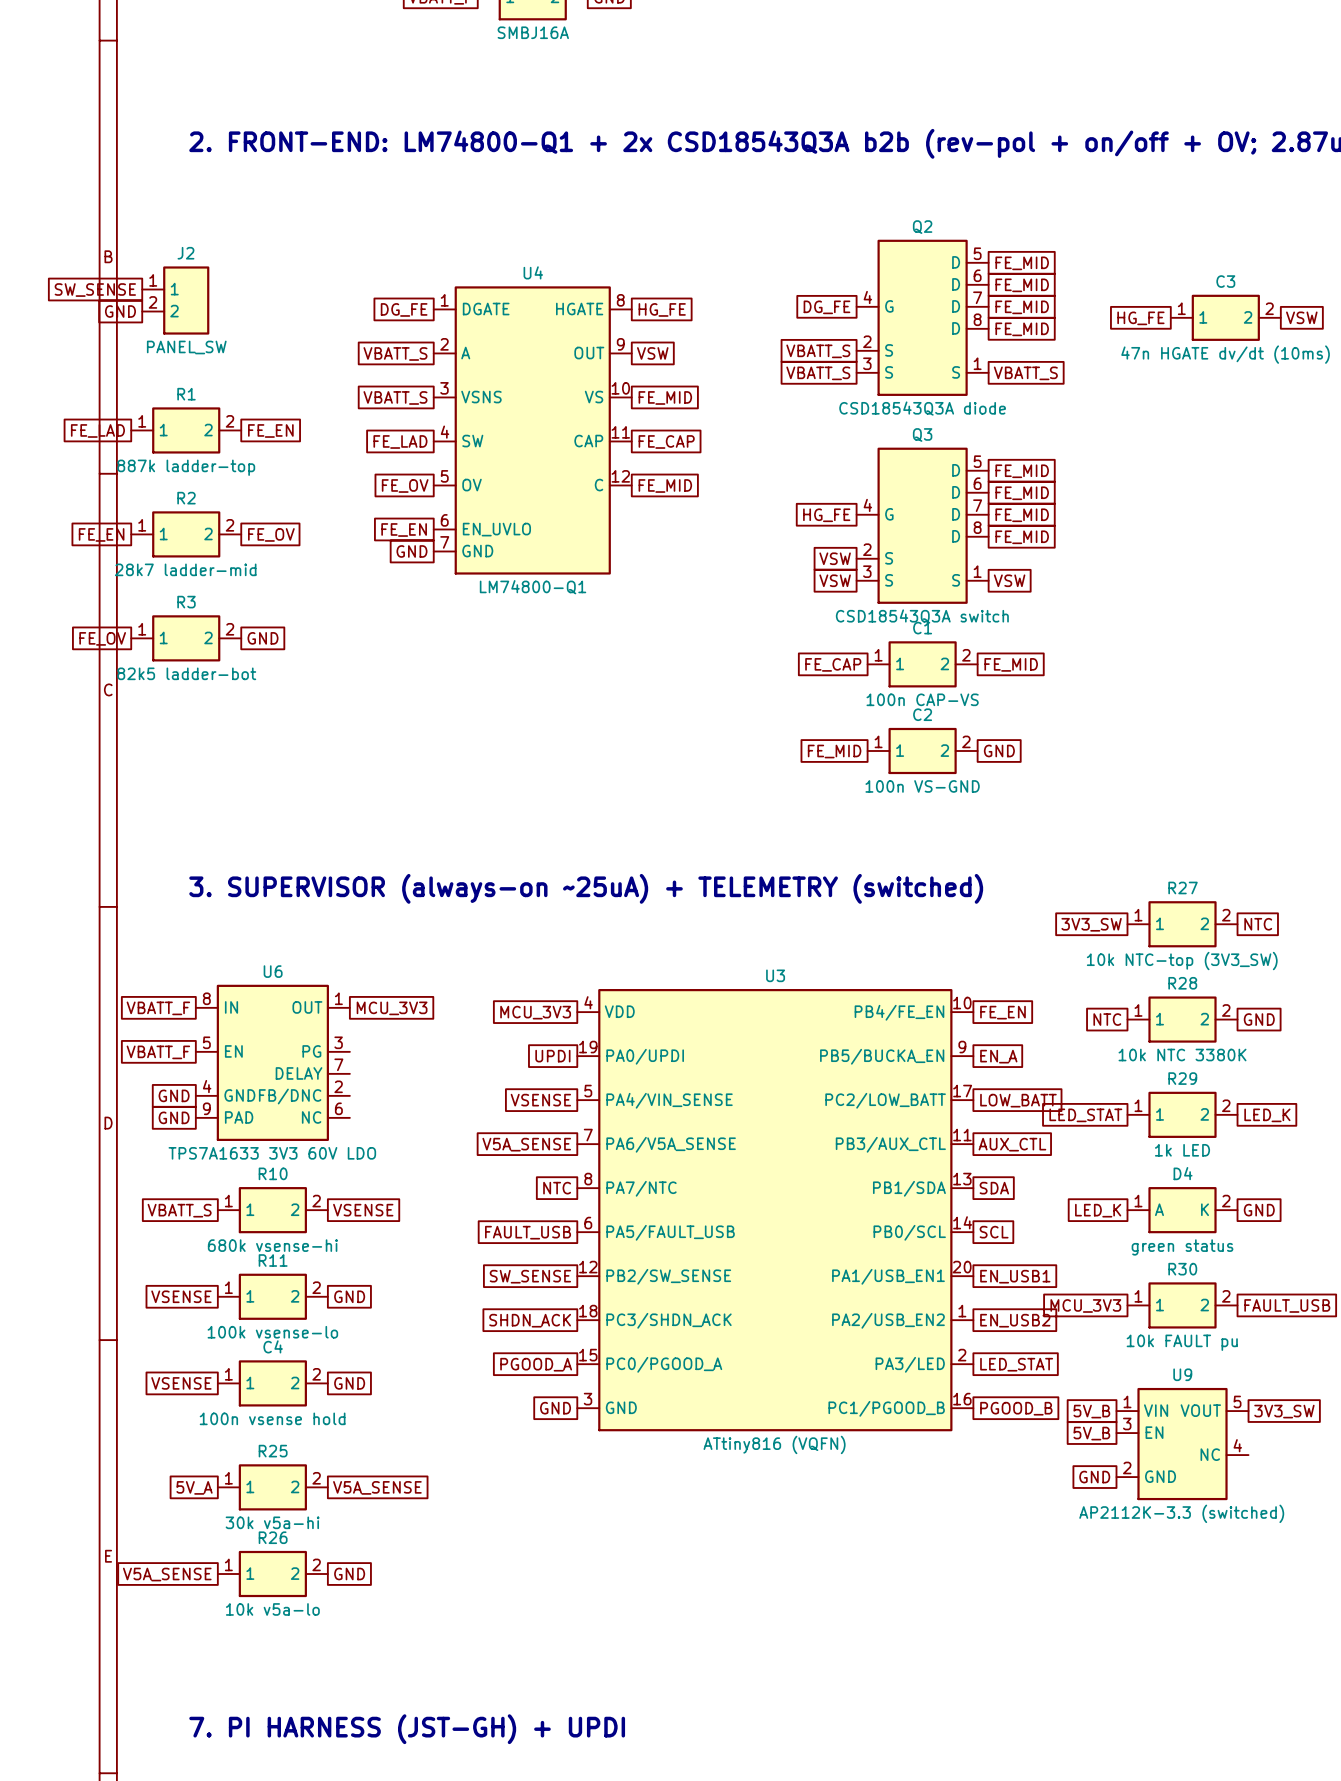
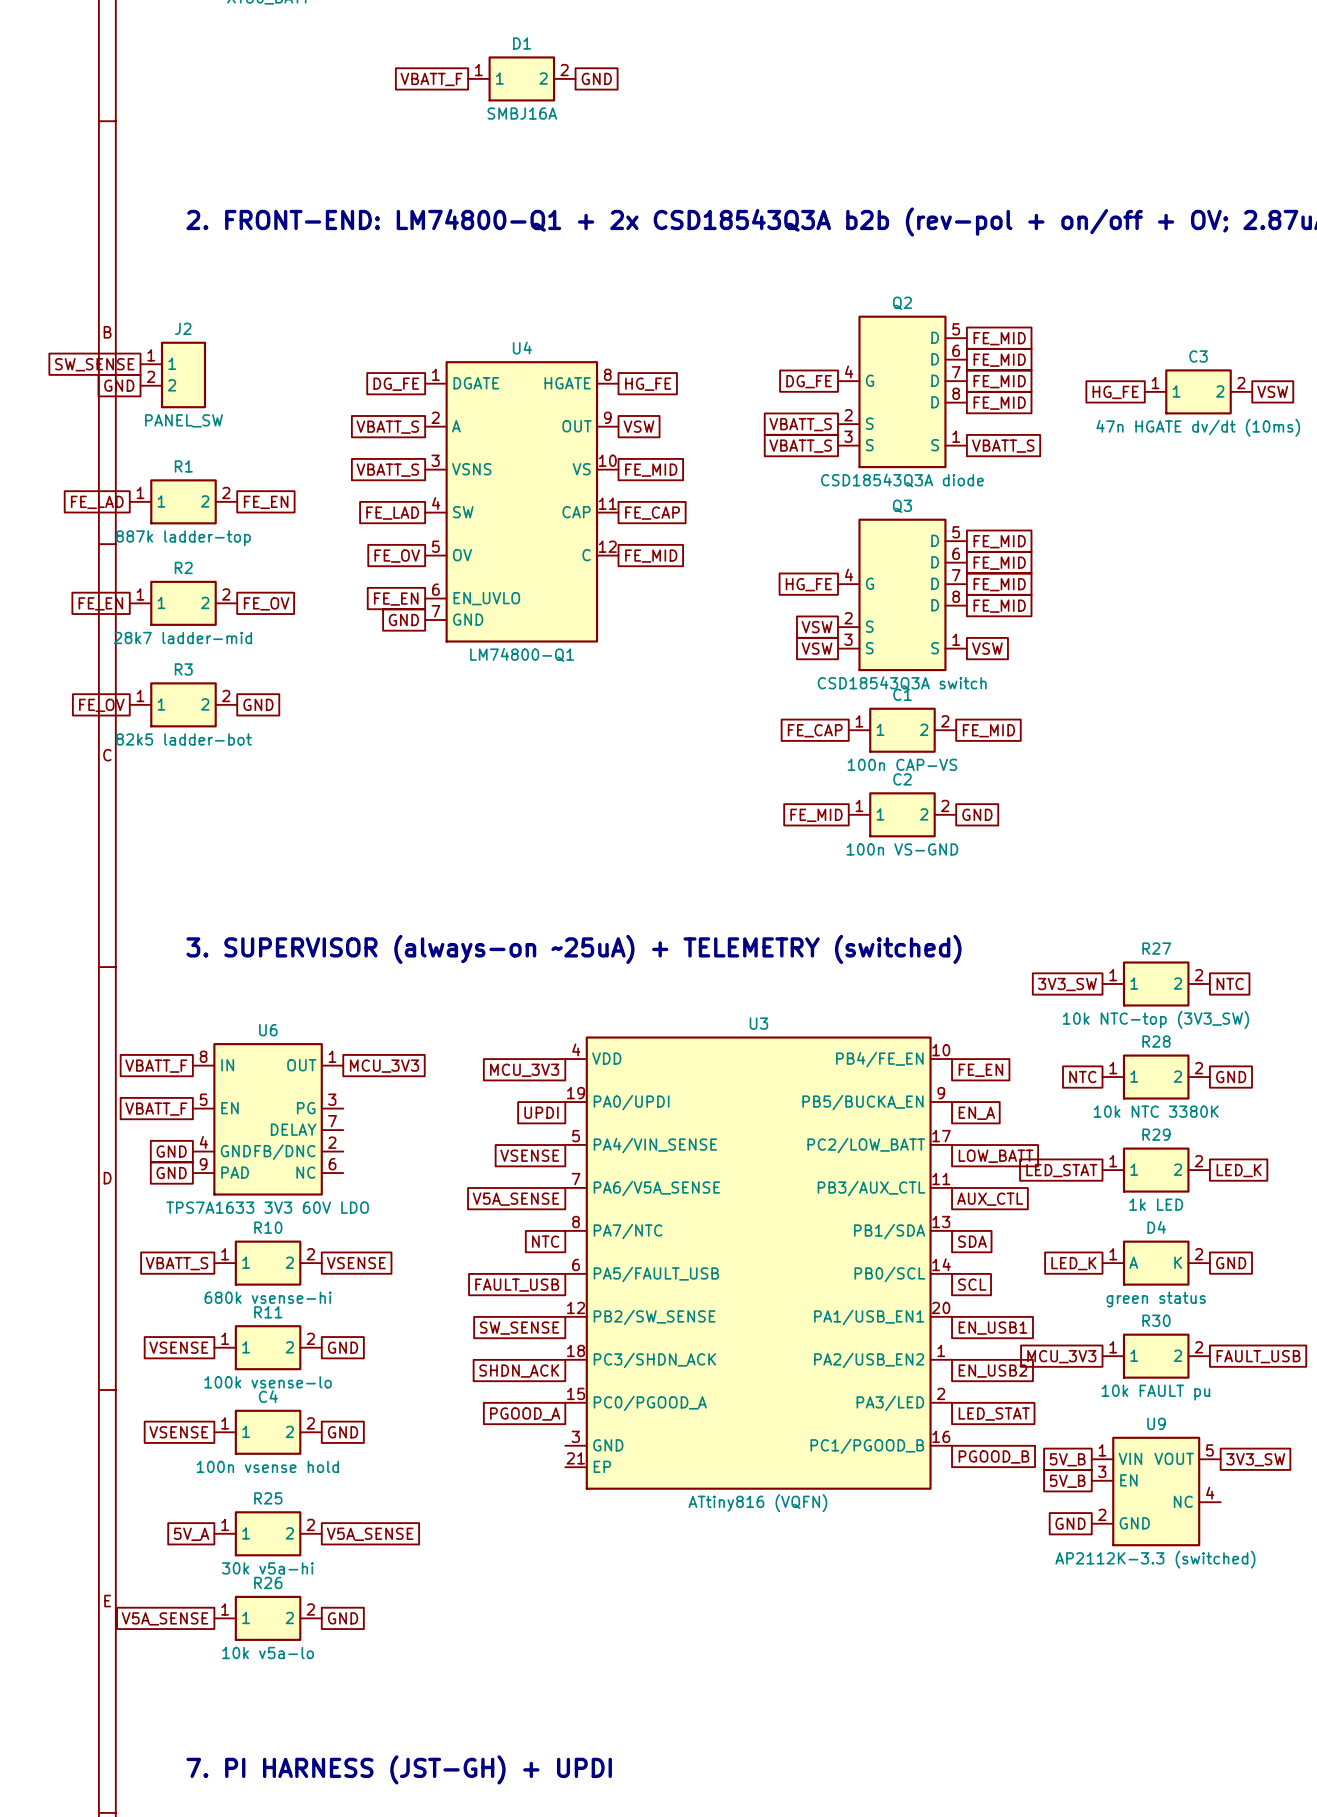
U3 symbol: [577, 989, 974, 1432] -> [565, 1036, 953, 1490]
global label: GND (555, 1408) -> none

